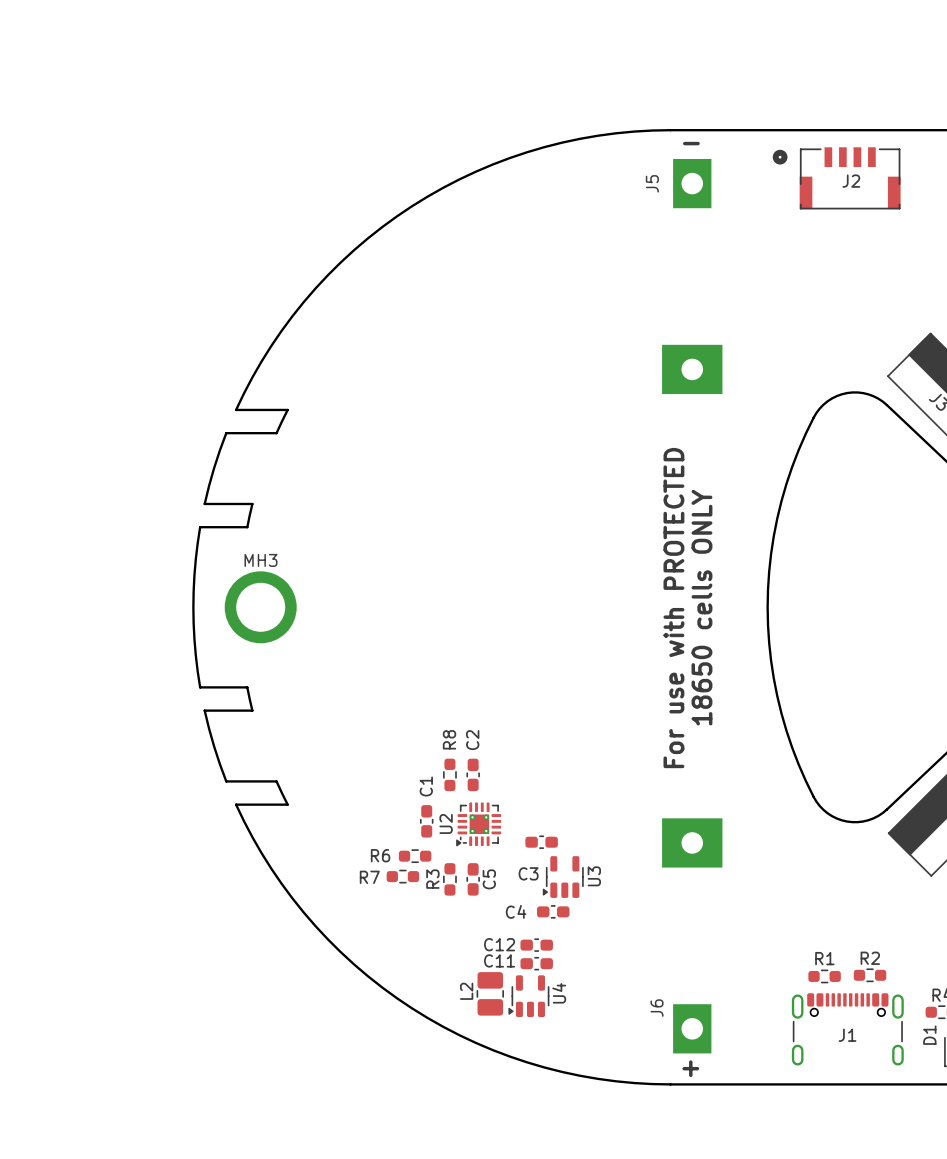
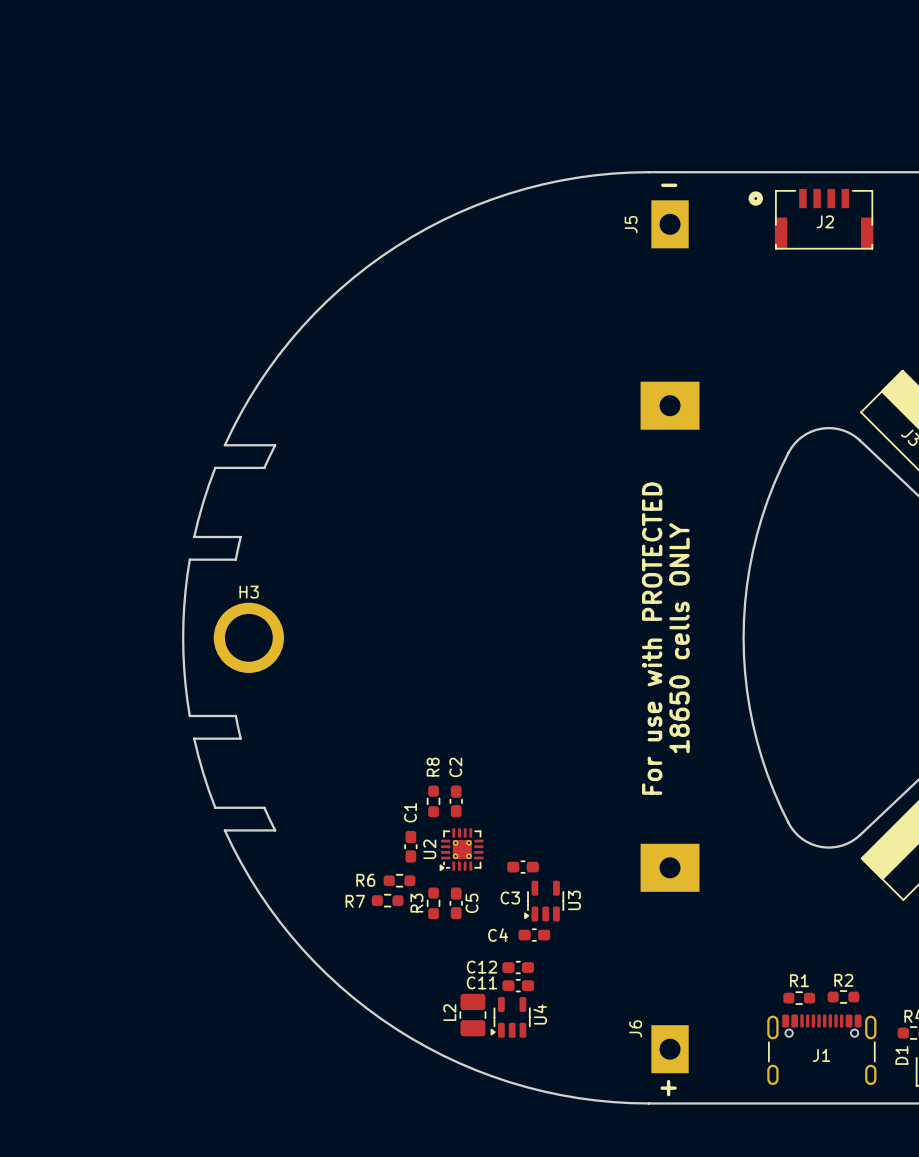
MH3 name: MH3 (260, 560) -> H3 (249, 592)

